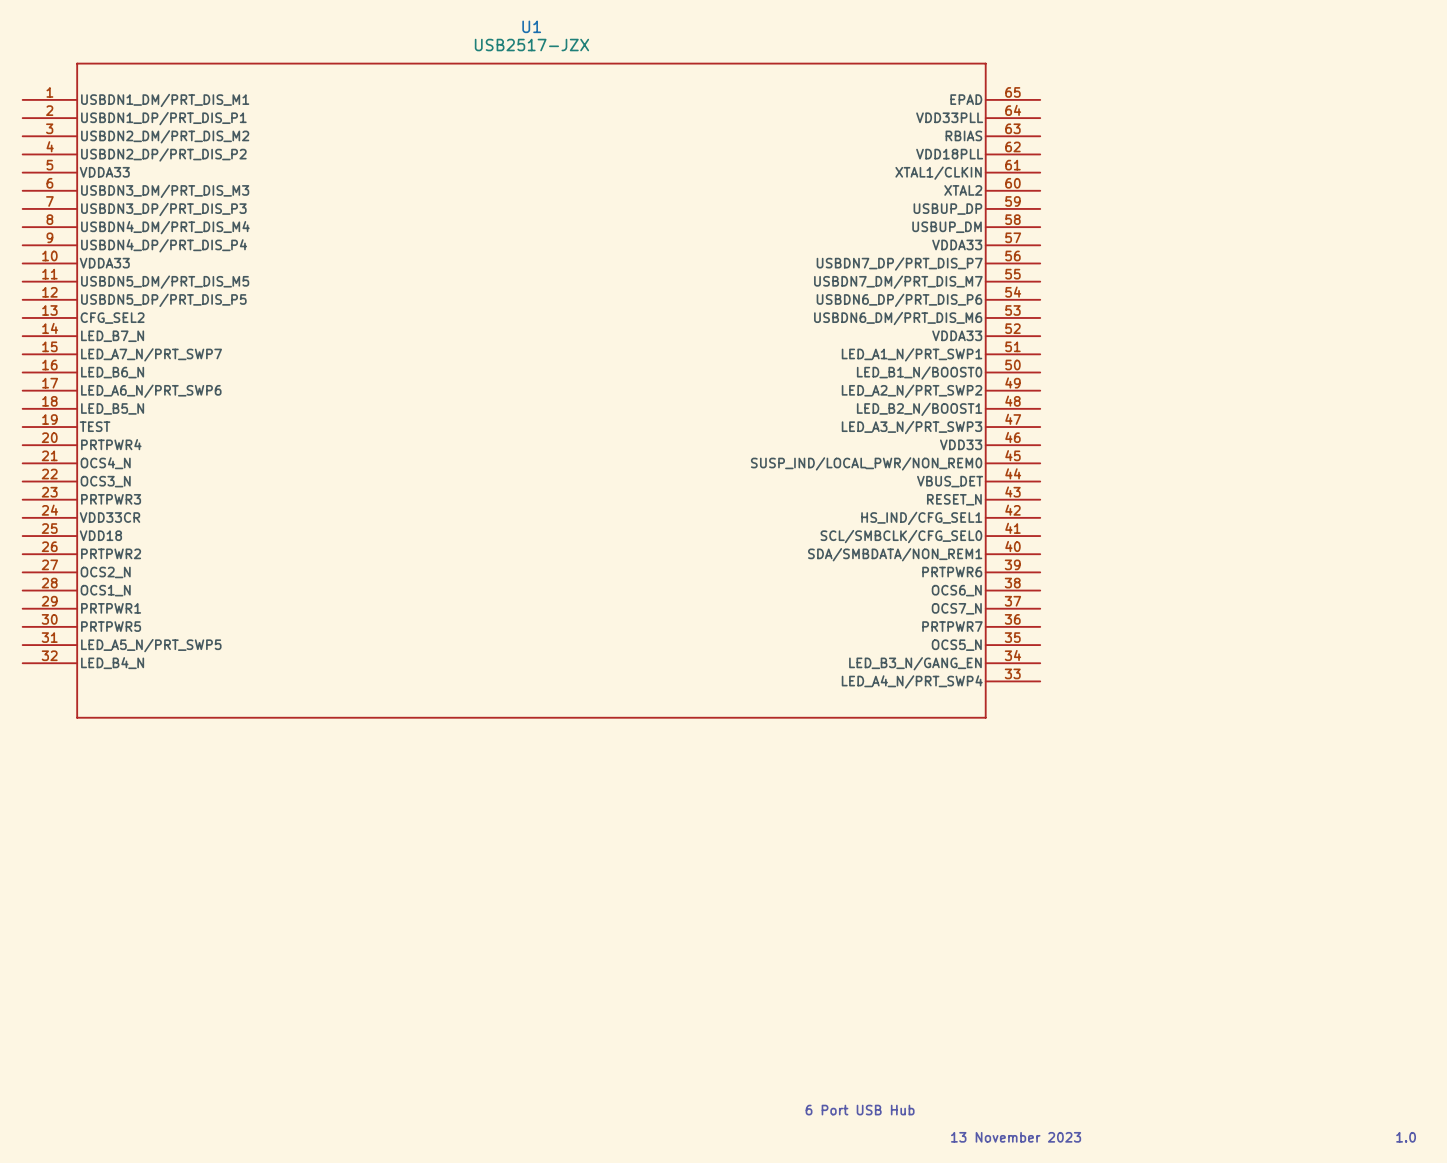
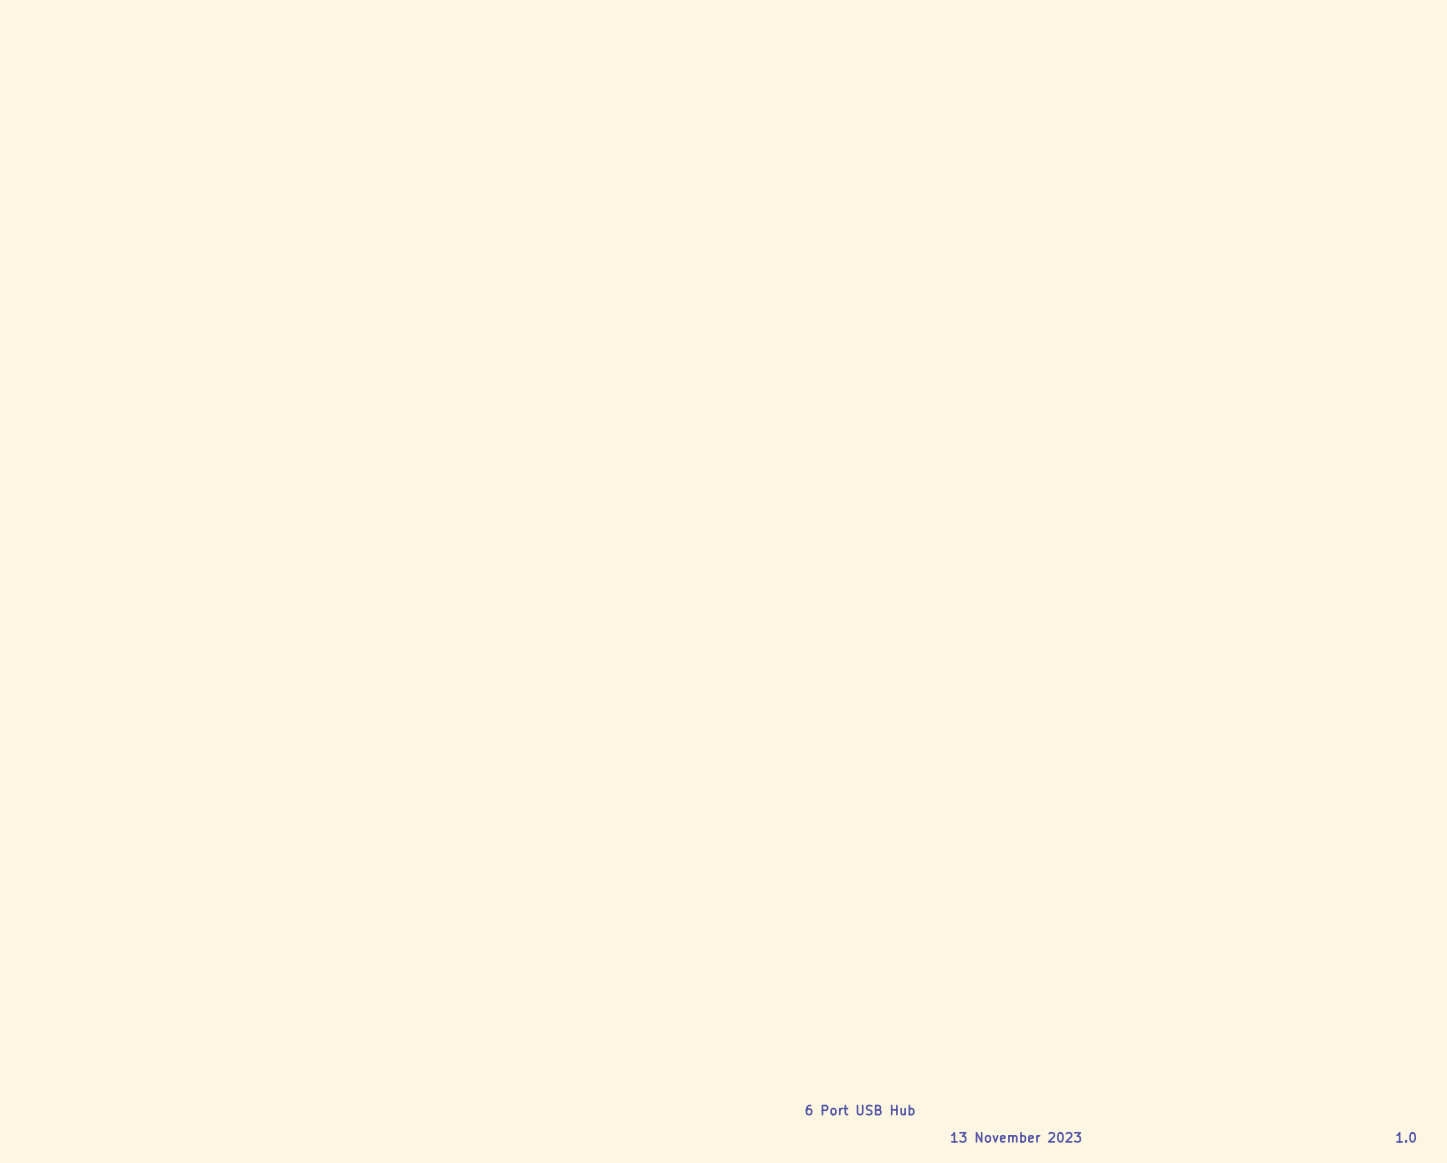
U1: USB2517-JZX (531, 390) -> none

